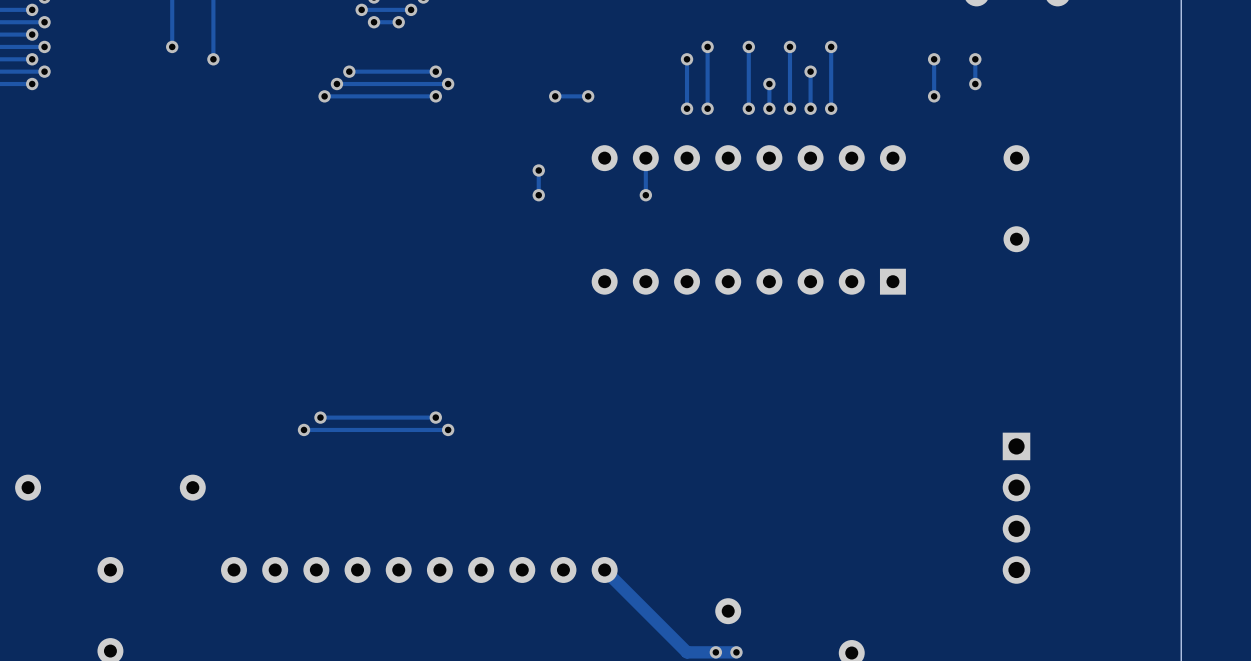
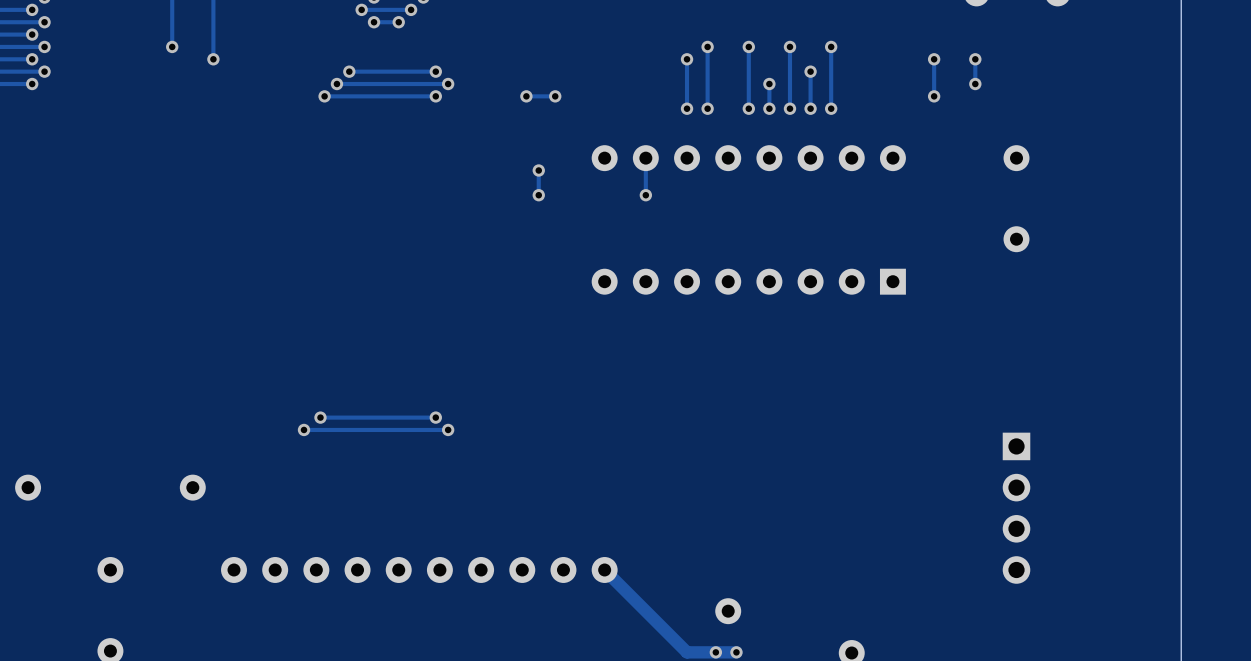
via: none -> (526, 96)
track: none -> (551, 96) (526, 96)
track: (588, 96) (555, 96) -> none
via: (588, 96) -> none

